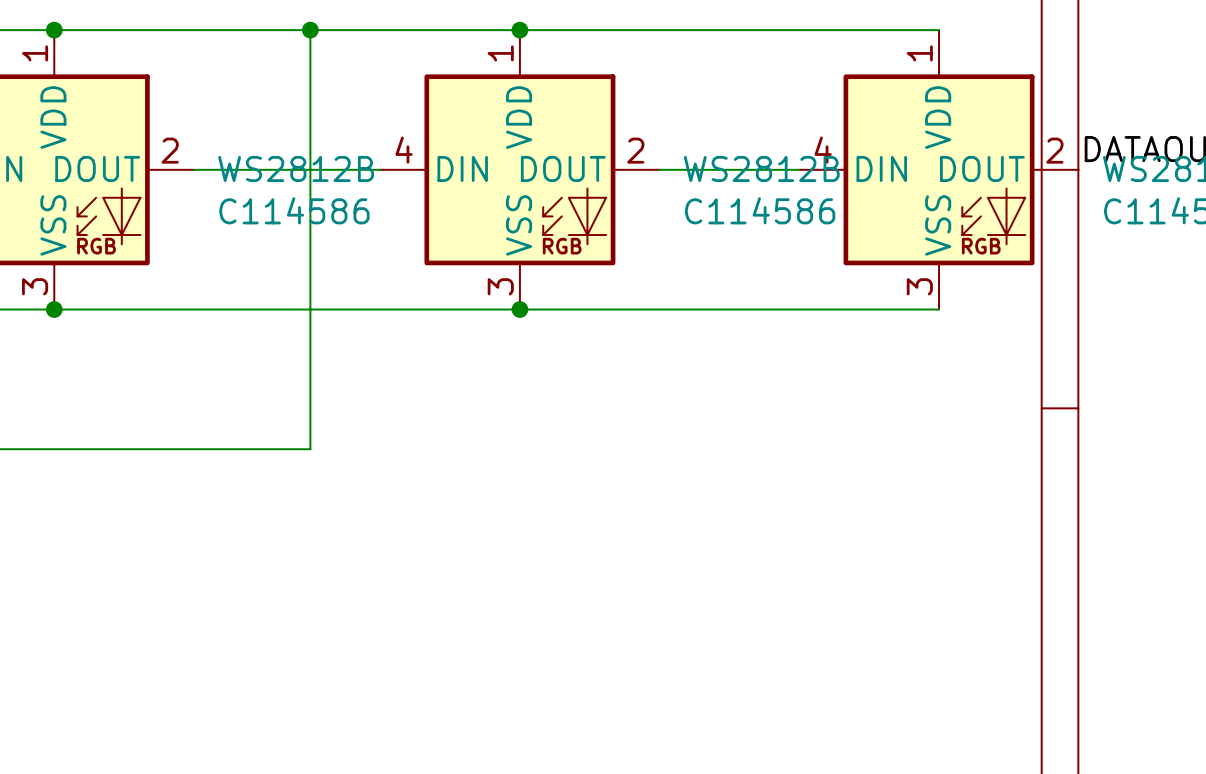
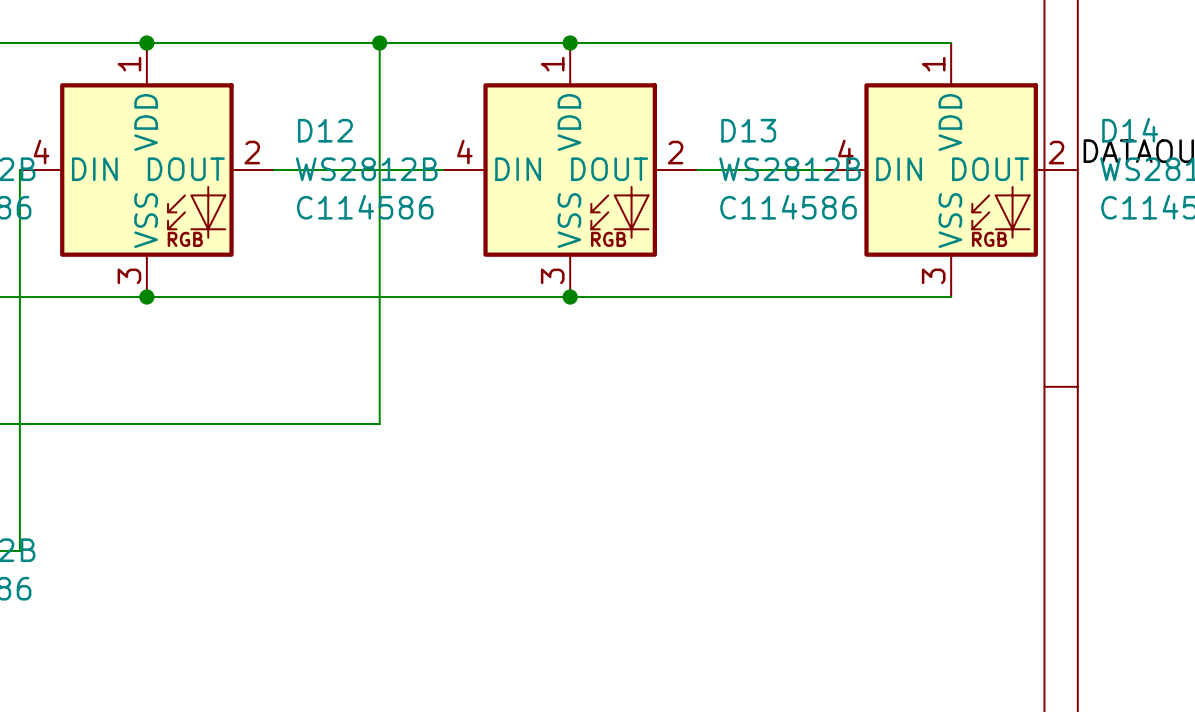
D12 name: none -> D12 (325, 130)
D13 name: none -> D13 (748, 130)
D14 name: none -> D14 (1130, 130)

